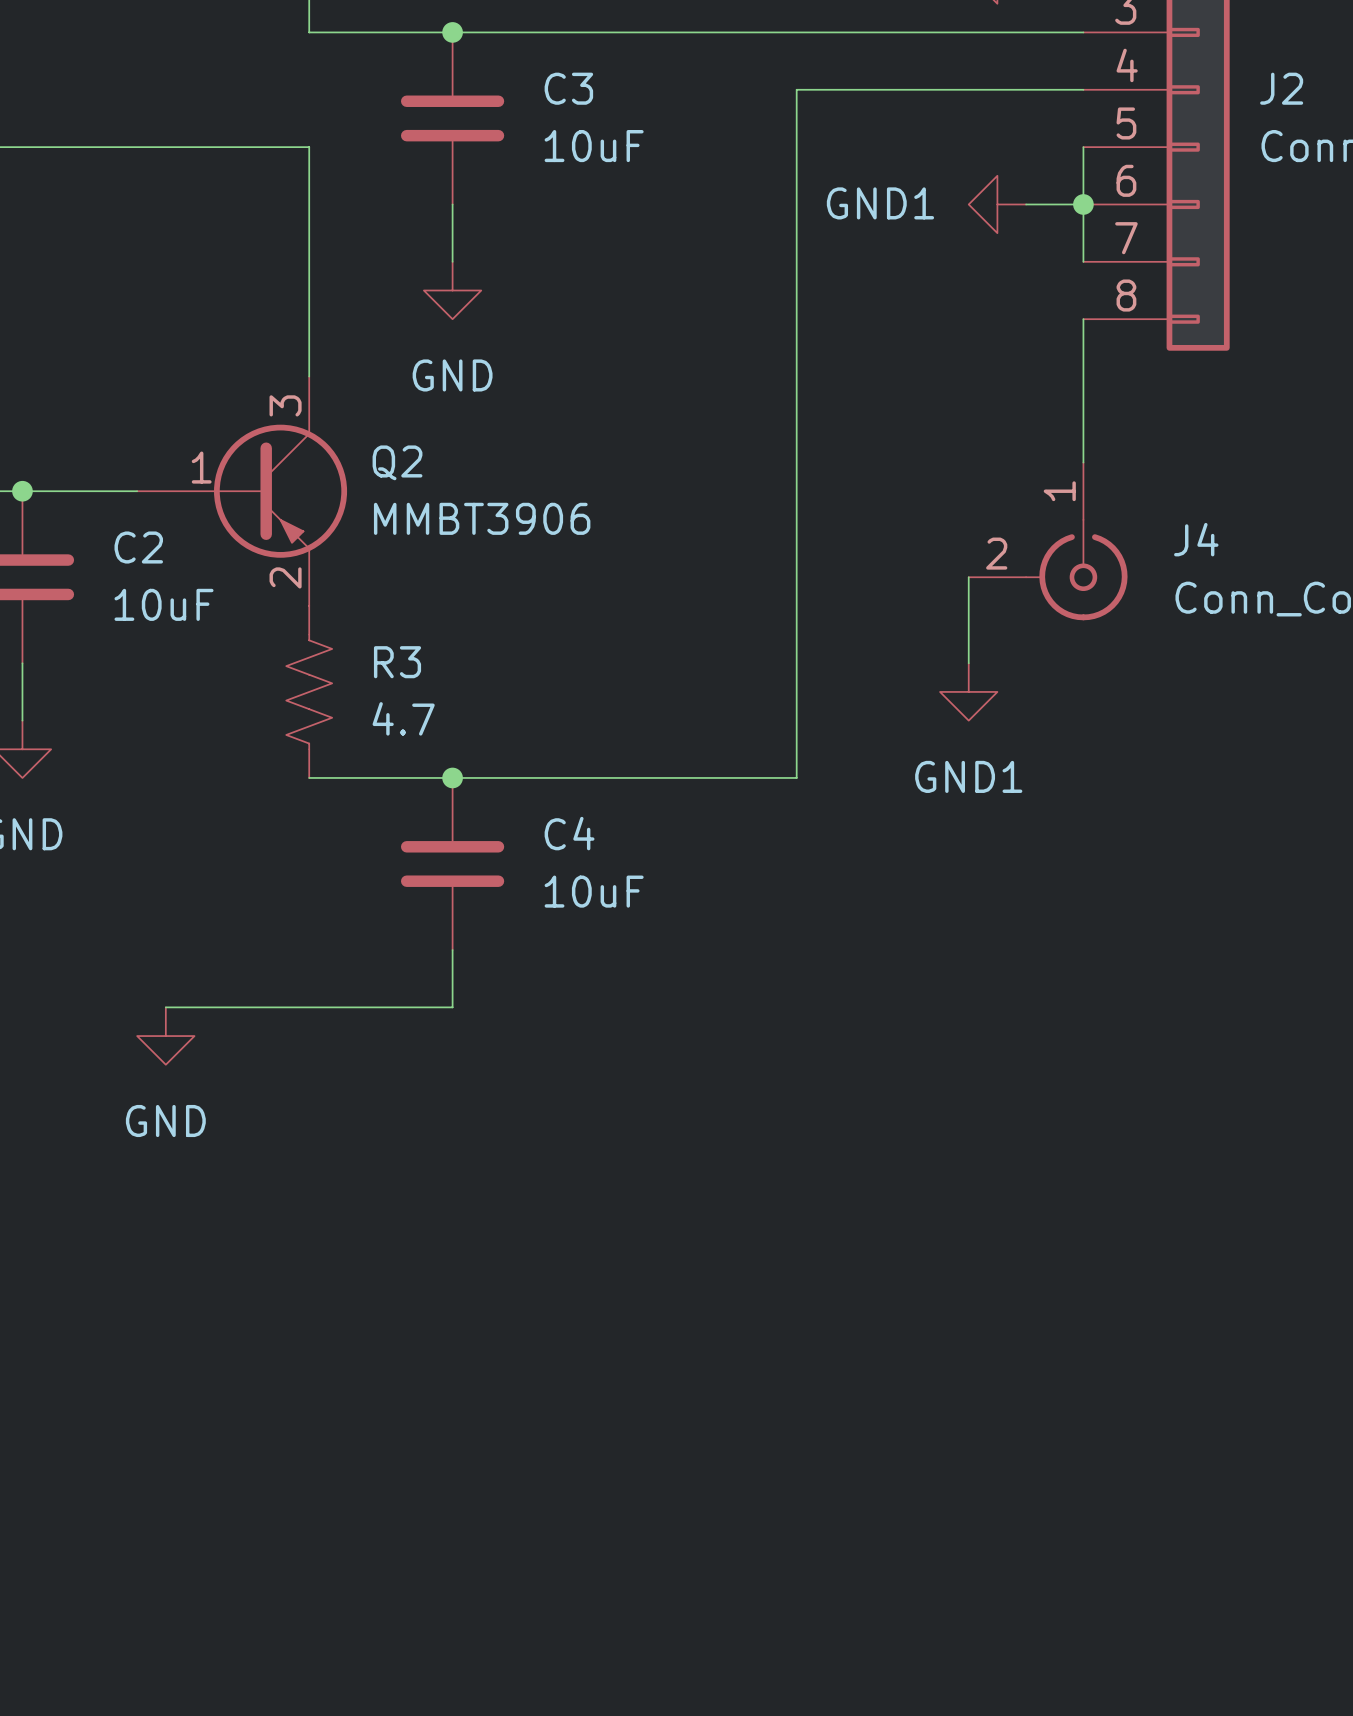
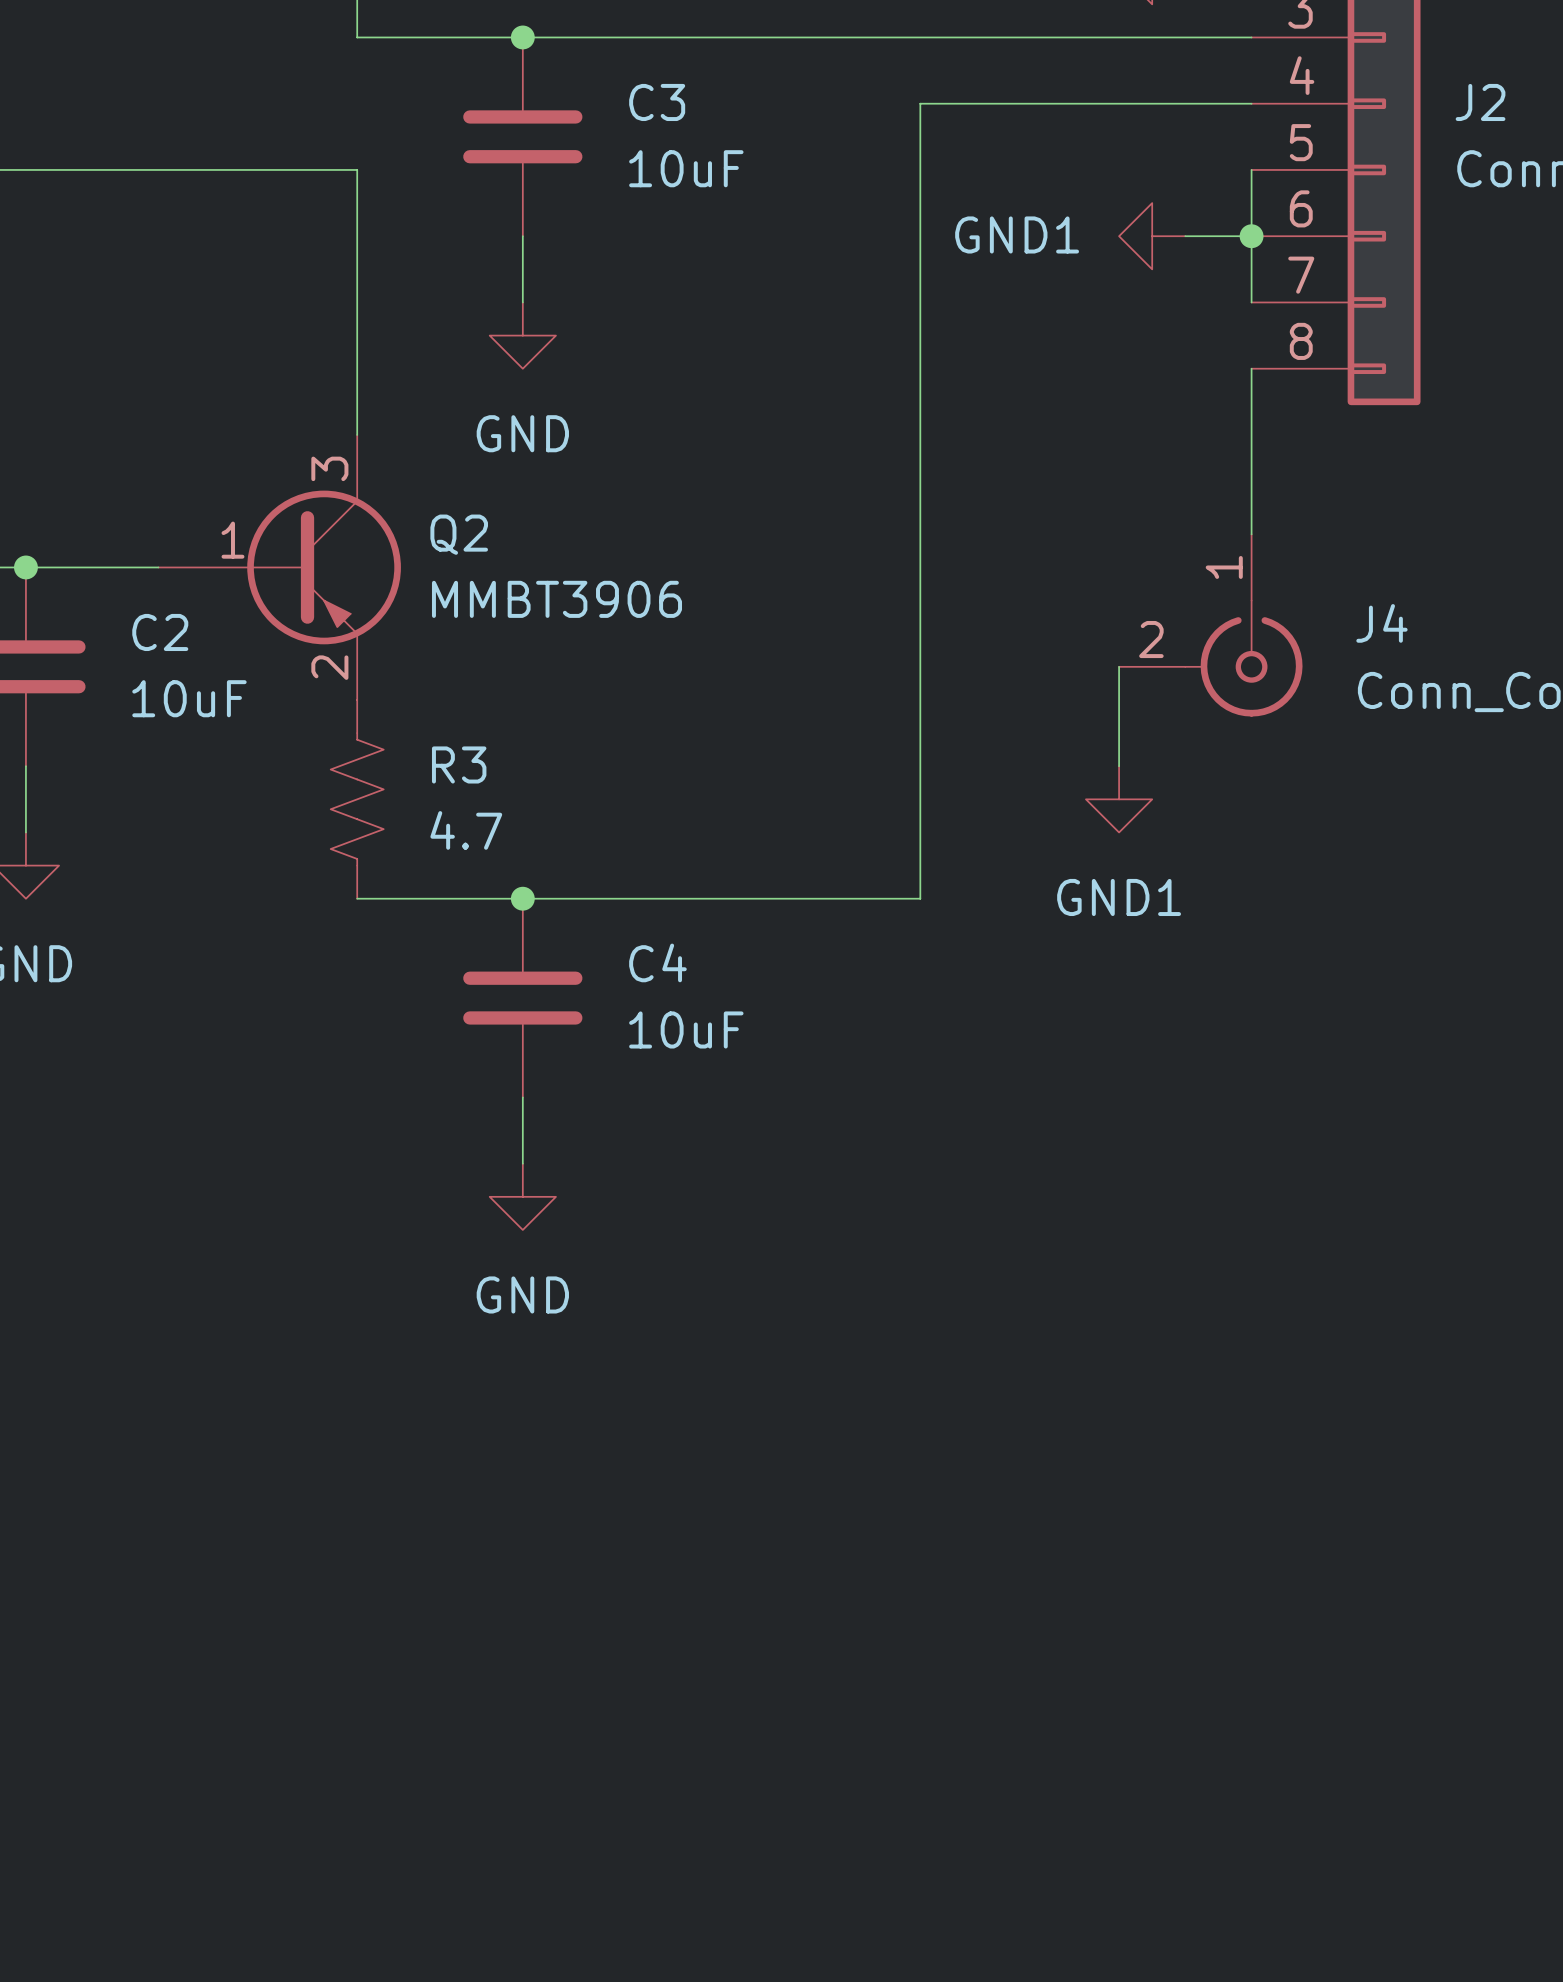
wire: (165, 1007) (452, 1007) -> none
power symbol position: GND (165, 1036) -> GND (522, 1196)

